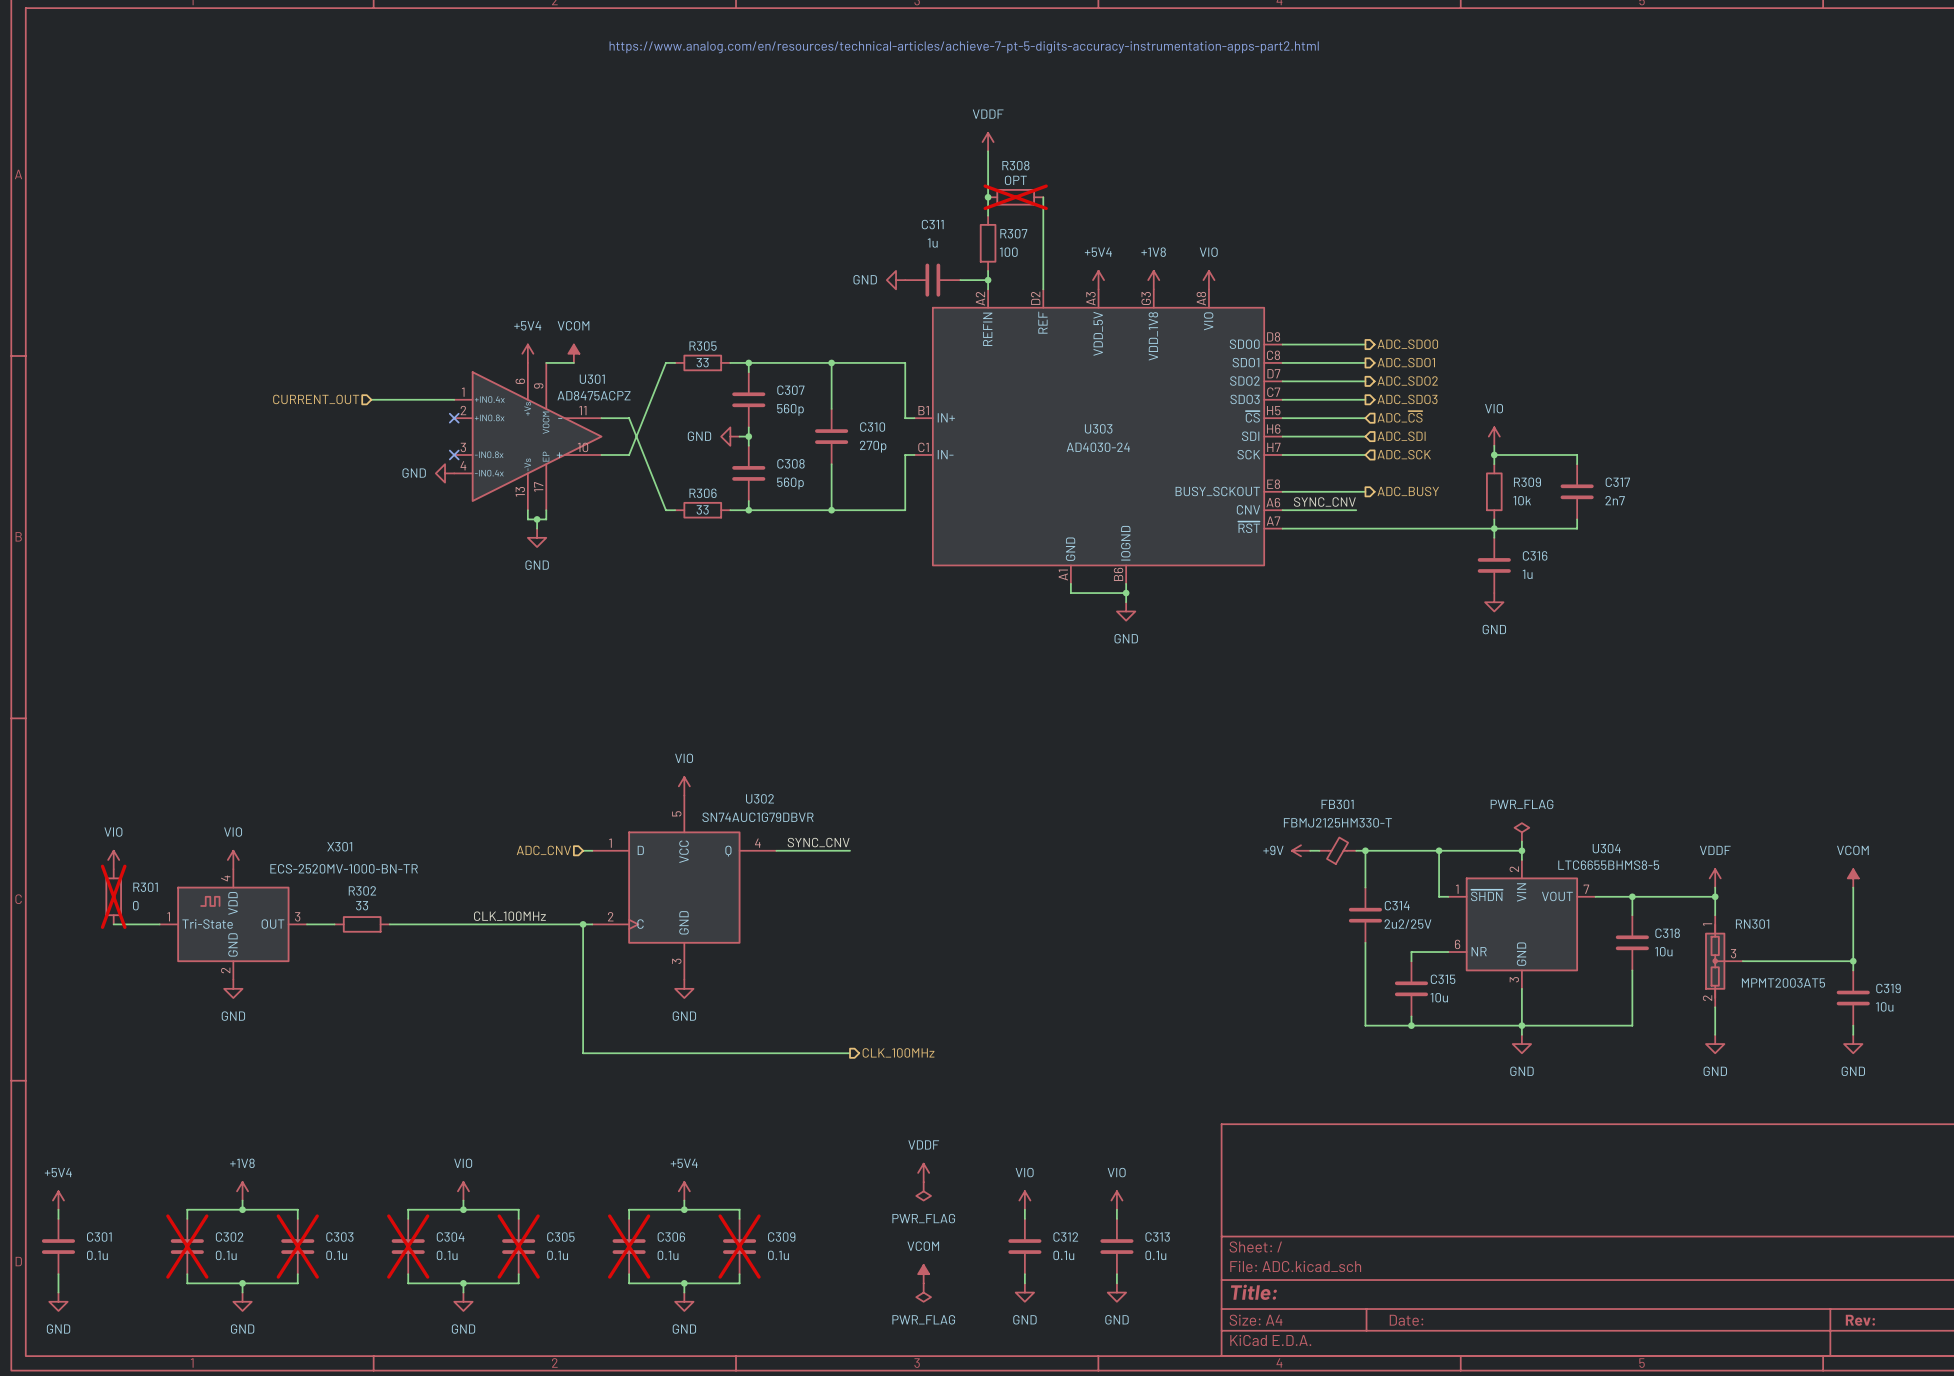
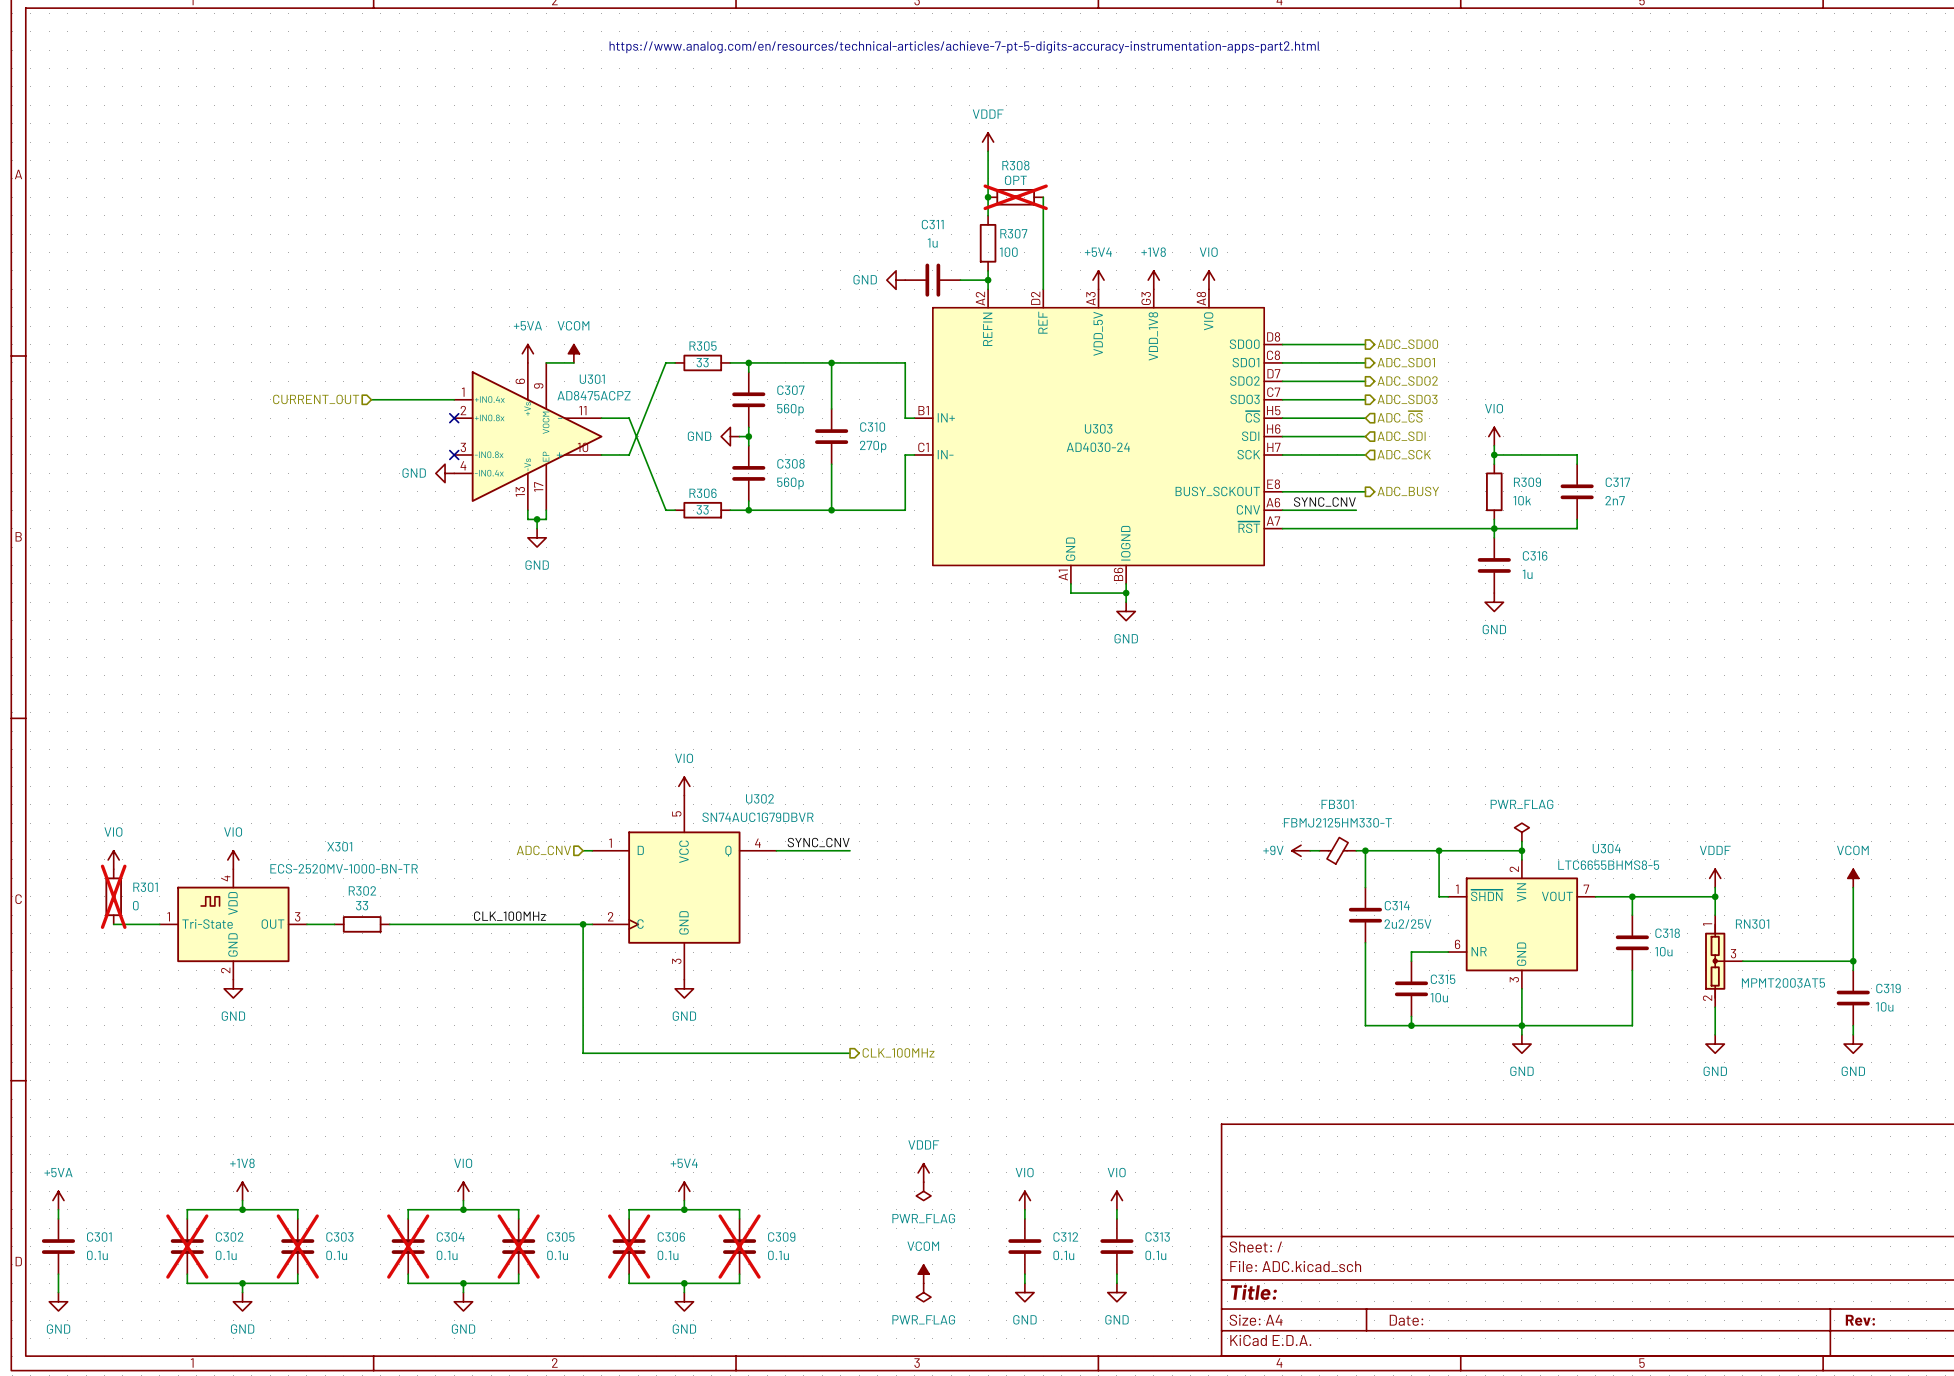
power symbol: +5V4 (527, 353) -> +5VA (527, 353)
power symbol: +5V4 (58, 1200) -> +5VA (58, 1200)

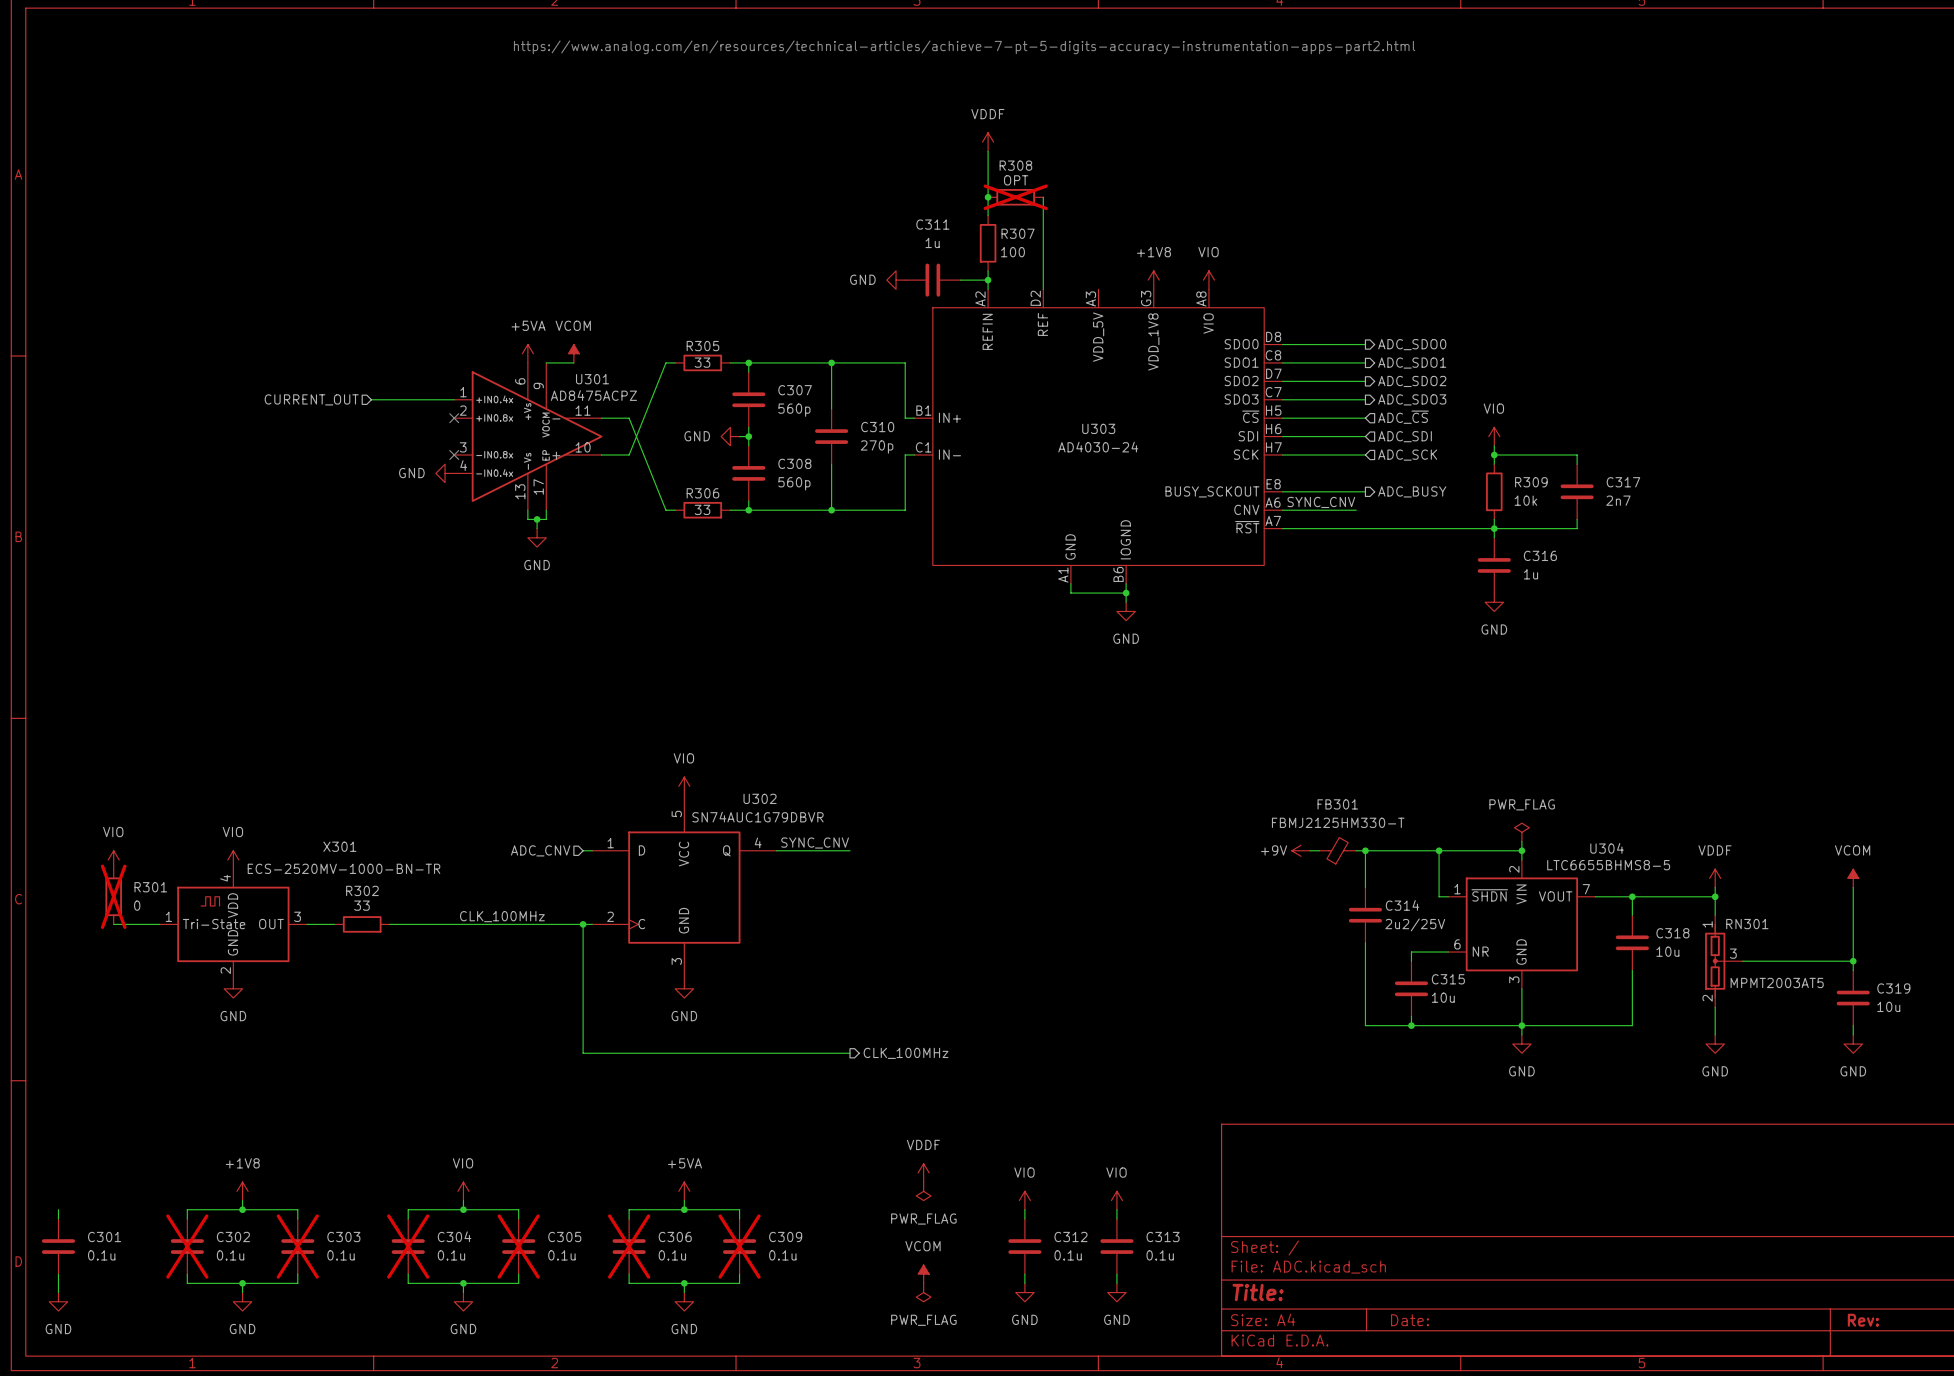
power symbol: +5V4 (1098, 280) -> none
power symbol: +5V4 (684, 1191) -> +5VA (684, 1191)
power symbol: +5VA (58, 1200) -> none

